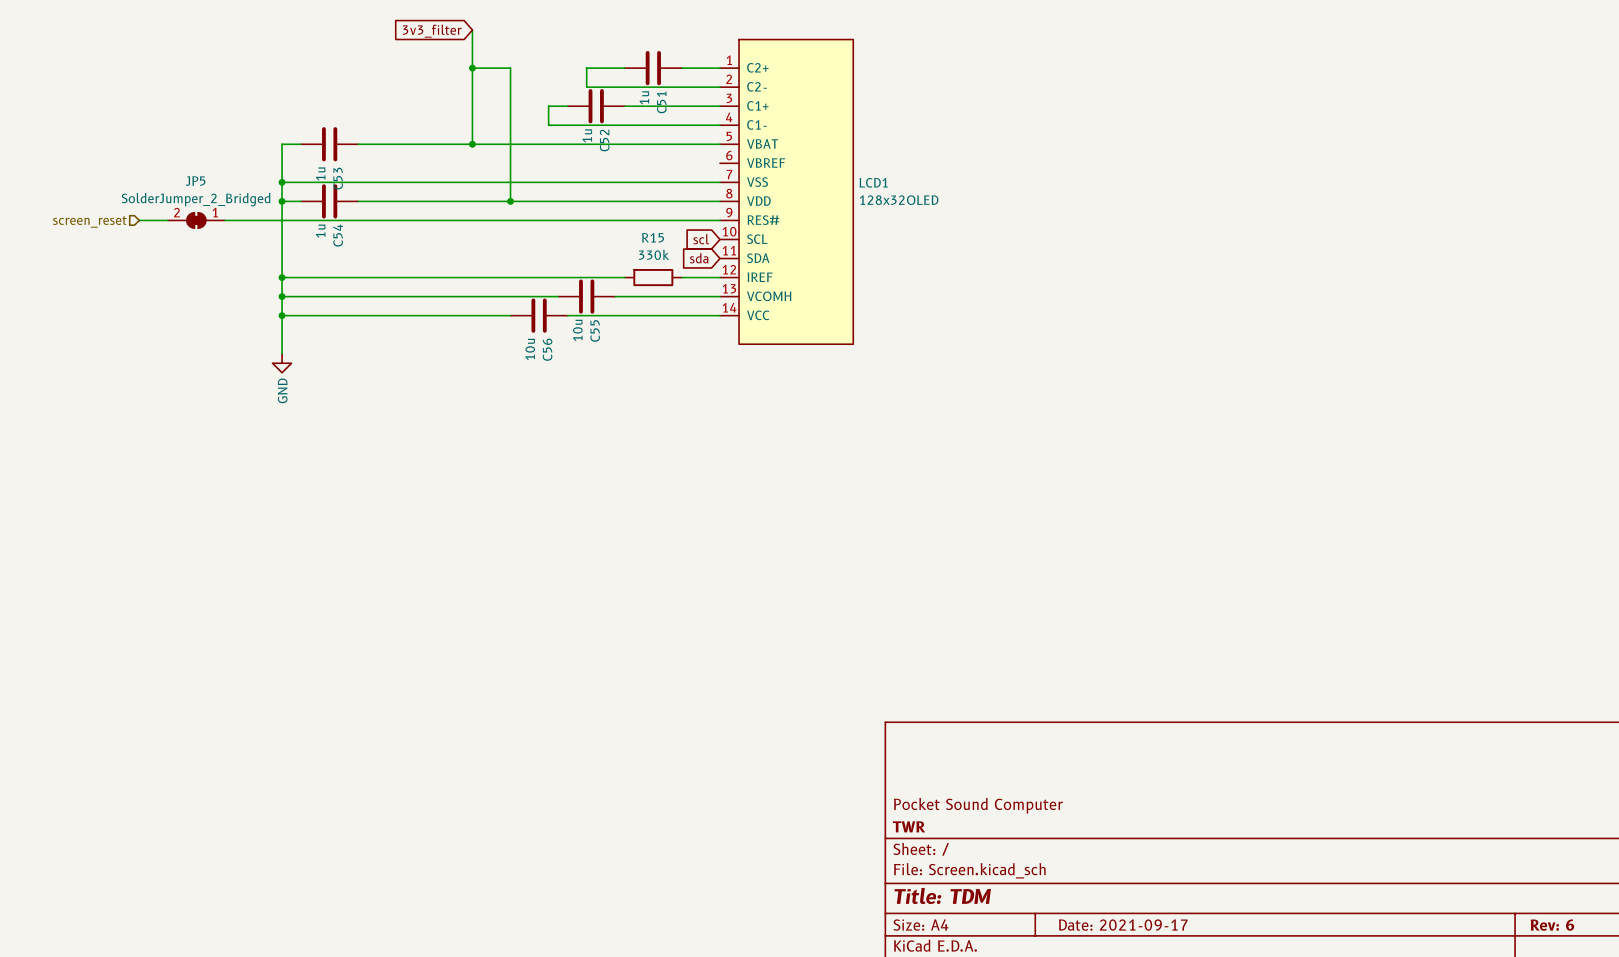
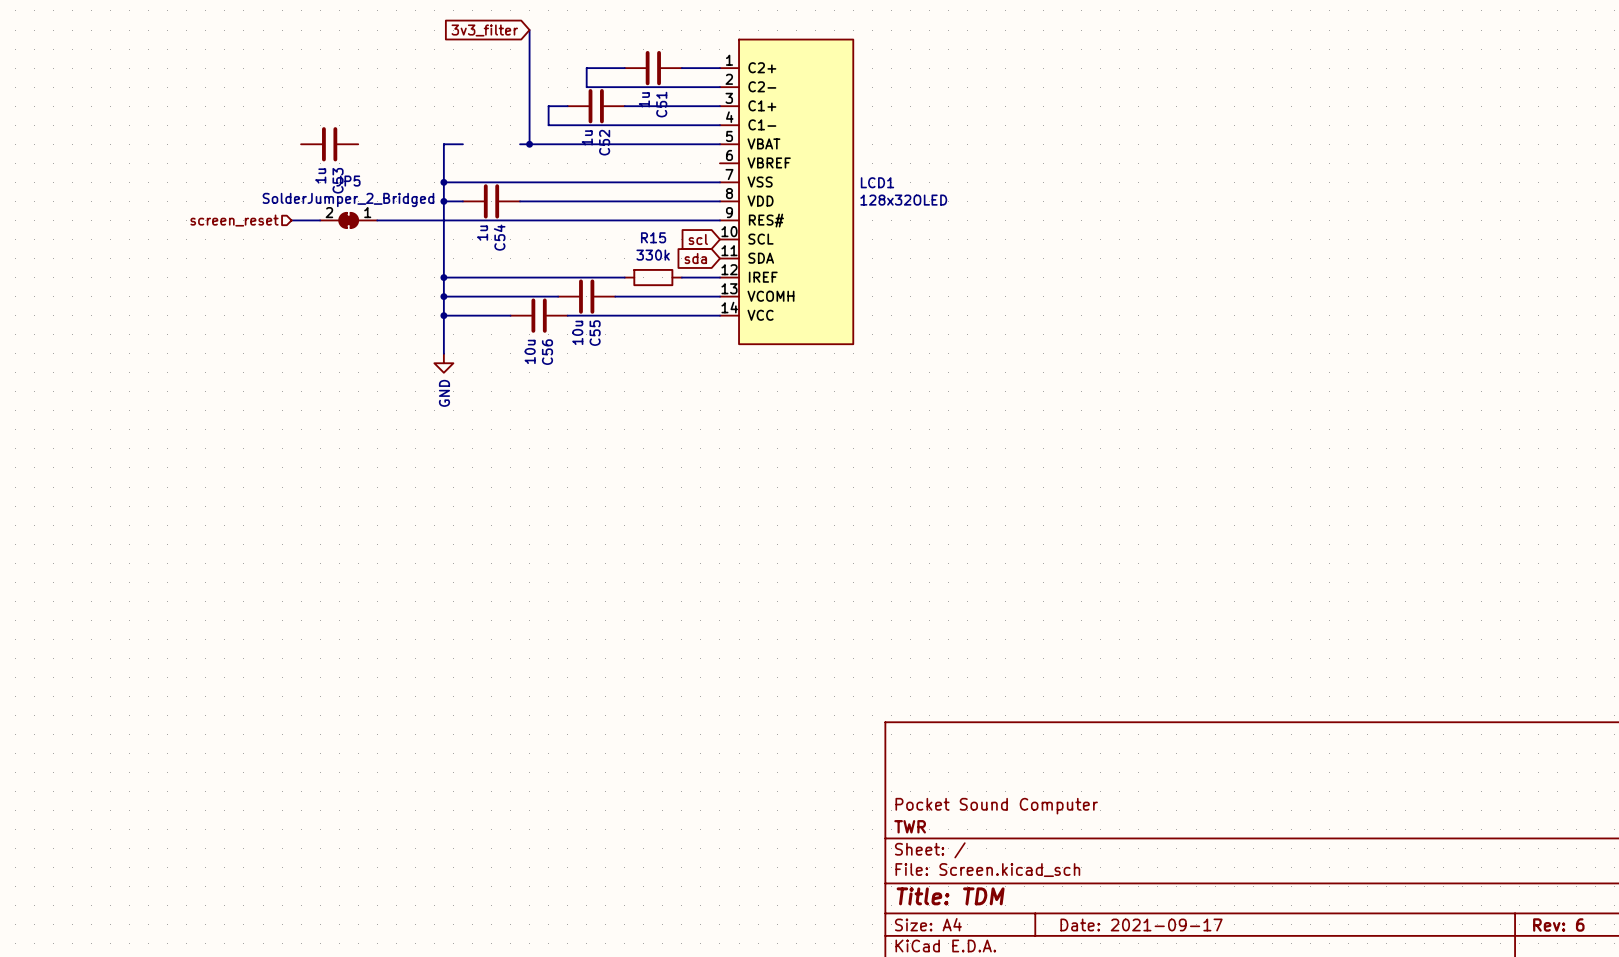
wire: (472, 30) (472, 144) -> (529, 30) (529, 144)
global label position: 3v3_filter (432, 31) -> 3v3_filter (484, 30)
wire: (472, 68) (510, 68) (510, 201) -> none
junction: (472, 68) -> none
wire: (301, 144) (282, 144) (282, 353) -> none
wire: (358, 144) (443, 144) -> (443, 353) (443, 144)
wire: (462, 144) (520, 144) -> none
junction: (472, 144) -> none
junction: none -> (529, 144)
wire: (282, 182) (443, 182) -> none
junction: (282, 182) -> none
junction: none -> (443, 182)
wire: (282, 201) (301, 201) -> none
junction: (282, 201) -> none
C54 position: (329, 201) -> (491, 201)
wire: (358, 201) (443, 201) -> none
junction: none -> (443, 201)
junction: (510, 201) -> none
wire: (139, 220) (167, 220) -> none
JP5 position: (196, 220) -> (348, 220)
wire: (224, 220) (291, 220) -> none
hierarchical label position: screen_reset (89, 221) -> screen_reset (234, 220)
wire: (282, 277) (443, 277) -> none
junction: (282, 277) -> none
junction: none -> (443, 277)
wire: (282, 296) (443, 296) -> none
junction: (282, 296) -> none
junction: none -> (443, 296)
wire: (282, 315) (443, 315) -> none
junction: (282, 315) -> none
junction: none -> (443, 315)
power symbol position: GND (282, 363) -> GND (443, 363)

